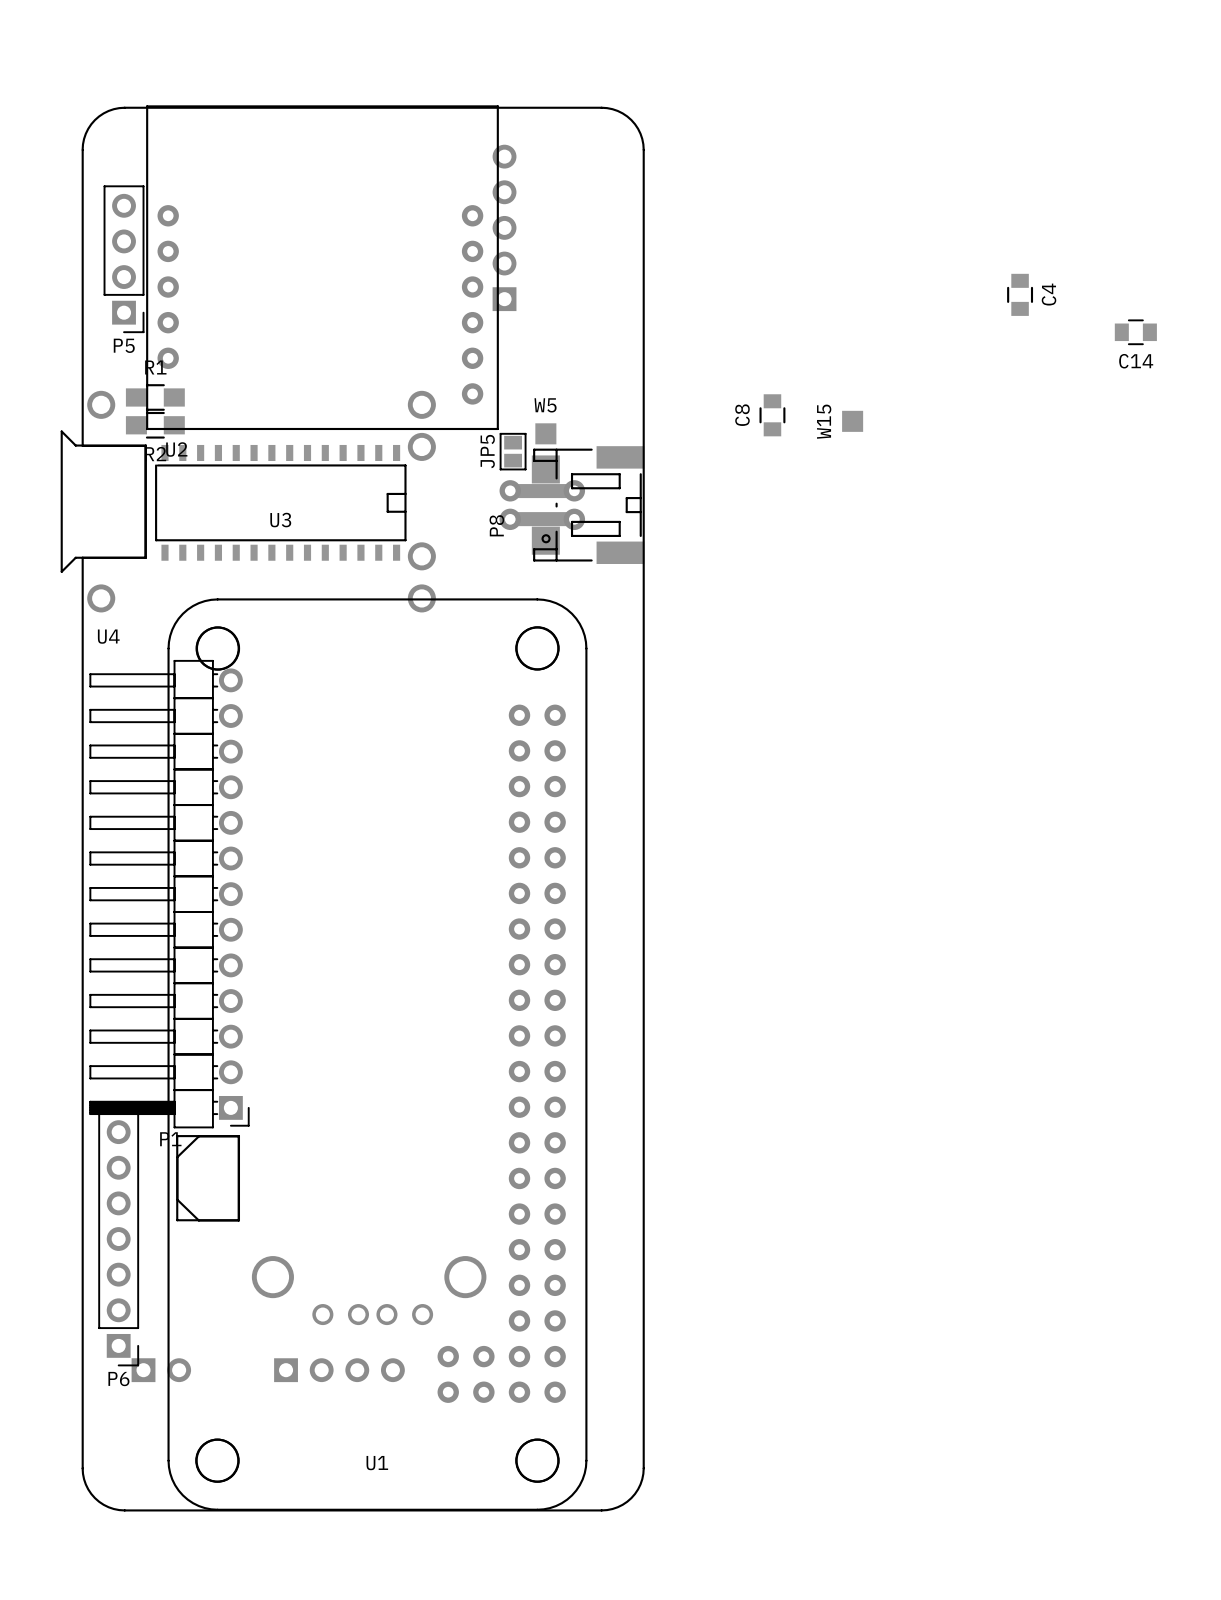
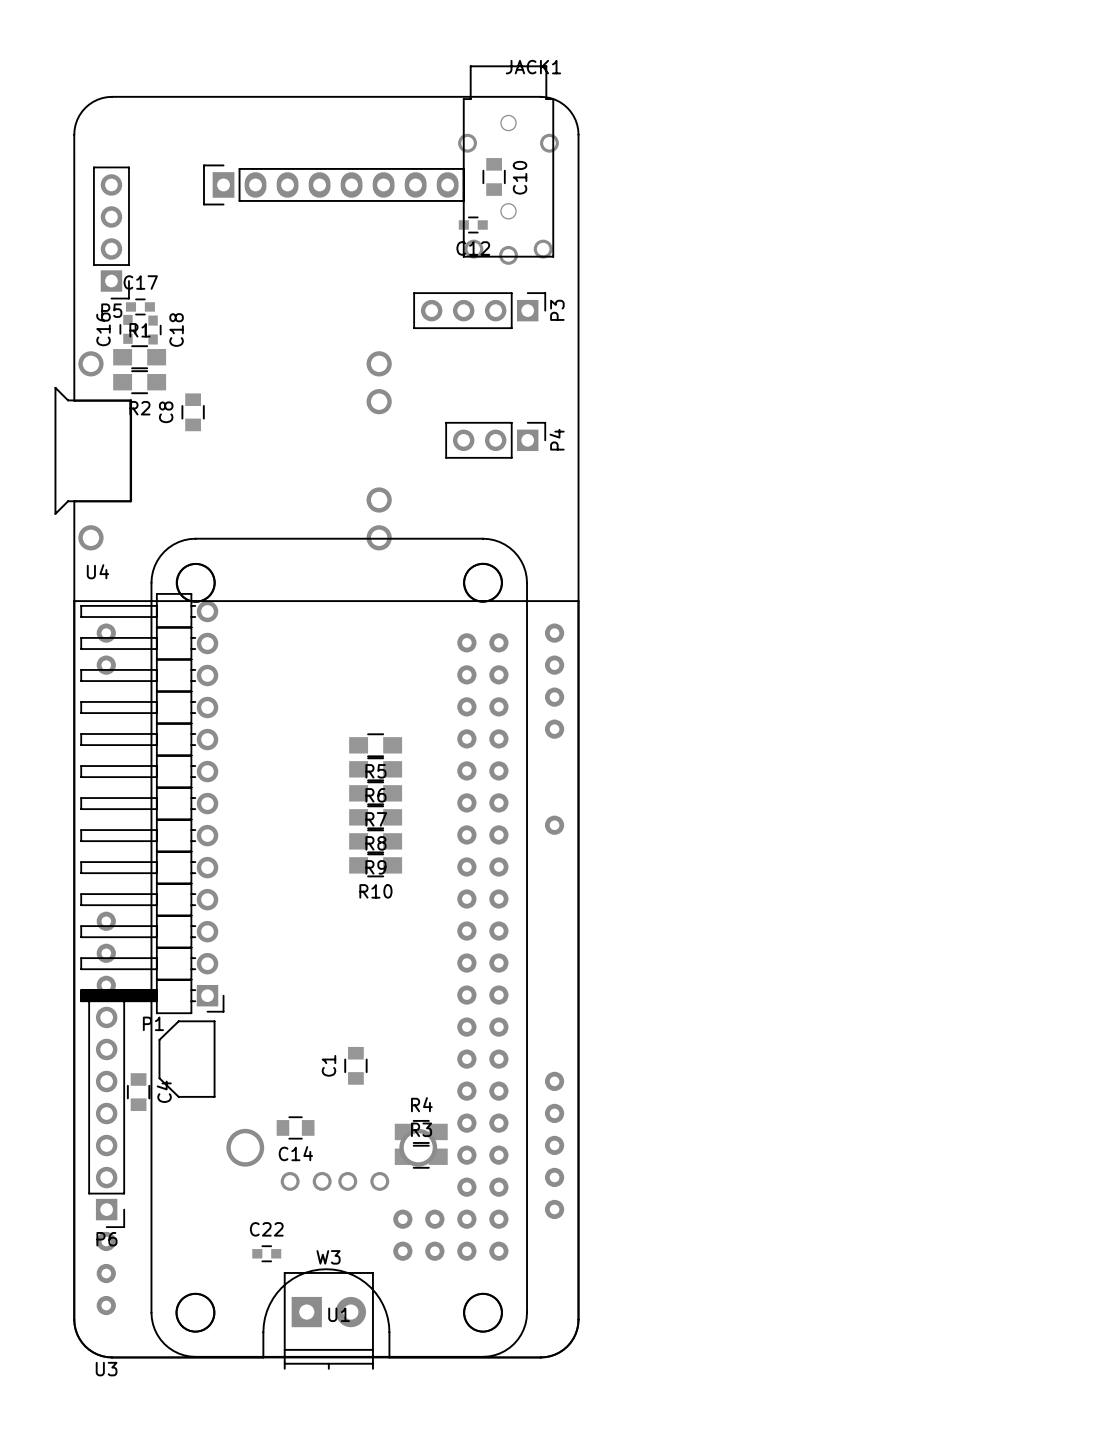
JACK1: none -> (508, 165)
C10: none -> (494, 176)
part: none -> (333, 184)
part: (504, 227) -> none
C12: none -> (473, 224)
U2: (322, 267) -> none
C4 position: (1020, 294) -> (138, 1092)
C14 position: (1135, 332) -> (295, 1127)
C17: none -> (140, 306)
P3: none -> (479, 310)
C16: none -> (127, 329)
C18: none -> (153, 330)
C8 position: (772, 415) -> (193, 412)
W15: (852, 421) -> none
W5: (545, 433) -> none
U3 footprint: [155, 444, 407, 561] -> [73, 600, 580, 1359]
JP5: (513, 451) -> none
P4: none -> (495, 440)
P8: (571, 505) -> none
U3 name position: U3 (280, 520) -> U3 (106, 1369)
U1 footprint: [167, 598, 588, 1511] -> [150, 537, 528, 1358]
R5: none -> (375, 745)
R6: none -> (375, 769)
R7: none -> (375, 793)
R8: none -> (375, 817)
R9: none -> (375, 841)
R10: none -> (375, 865)
C1: none -> (355, 1065)
R4: none -> (421, 1131)
R3: none -> (421, 1156)
part: (161, 1370) -> none
part: (339, 1370) -> none
C22: none -> (266, 1253)
W3: none -> (328, 1320)

